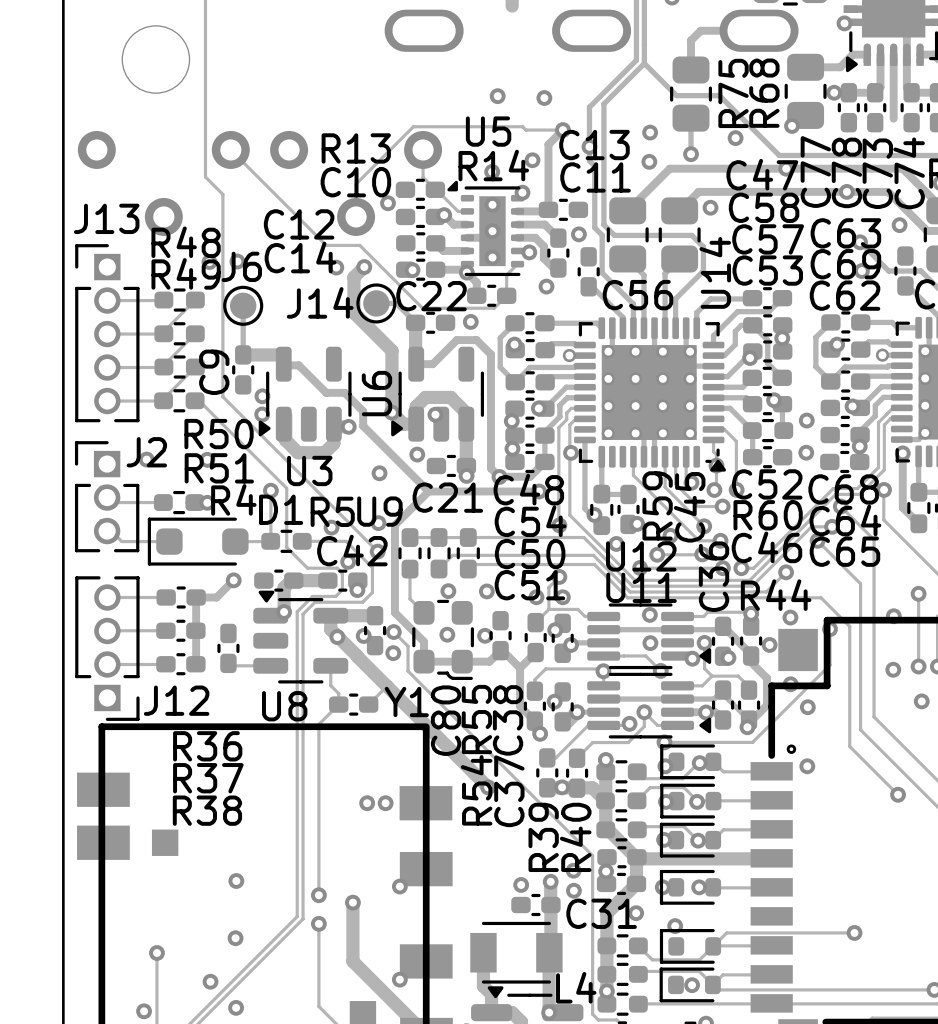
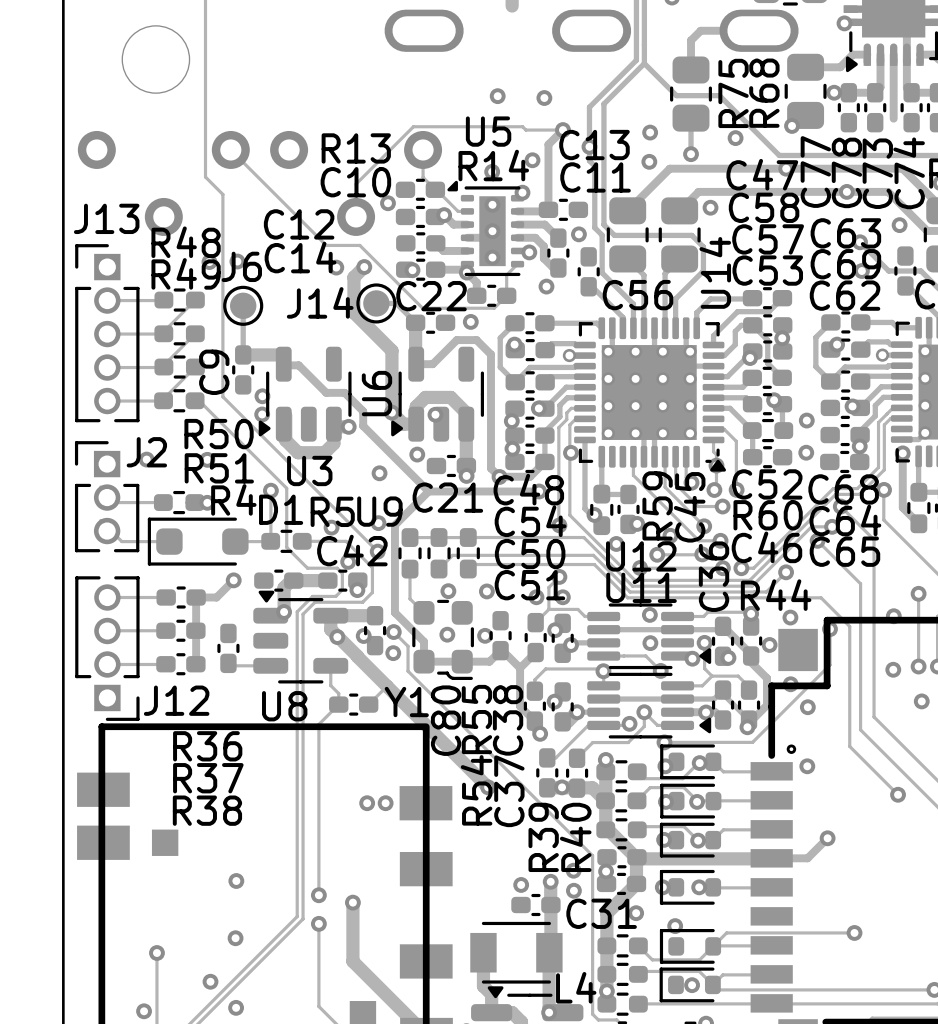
track: none -> (827, 838) (807, 858) (771, 858)
via: none -> (827, 838)
via: (399, 886) -> none
via: (399, 979) -> none

